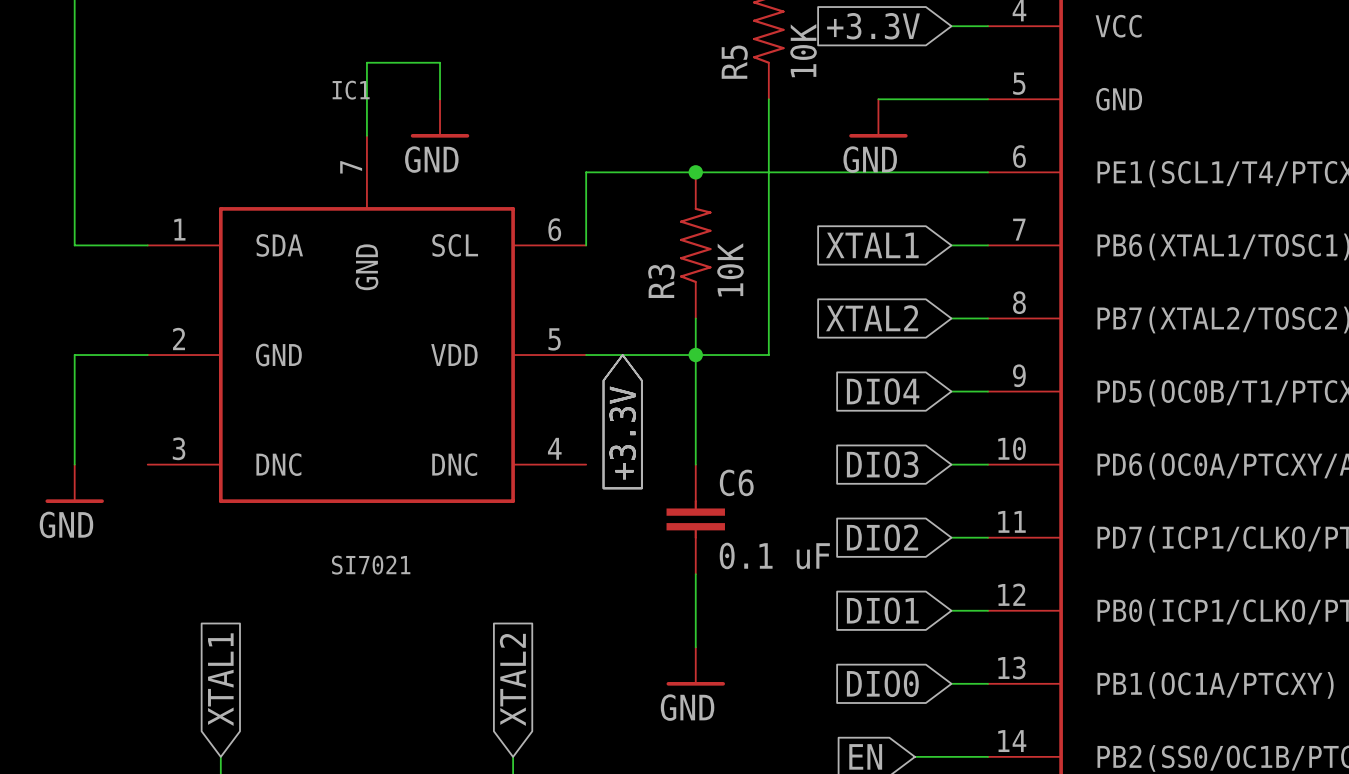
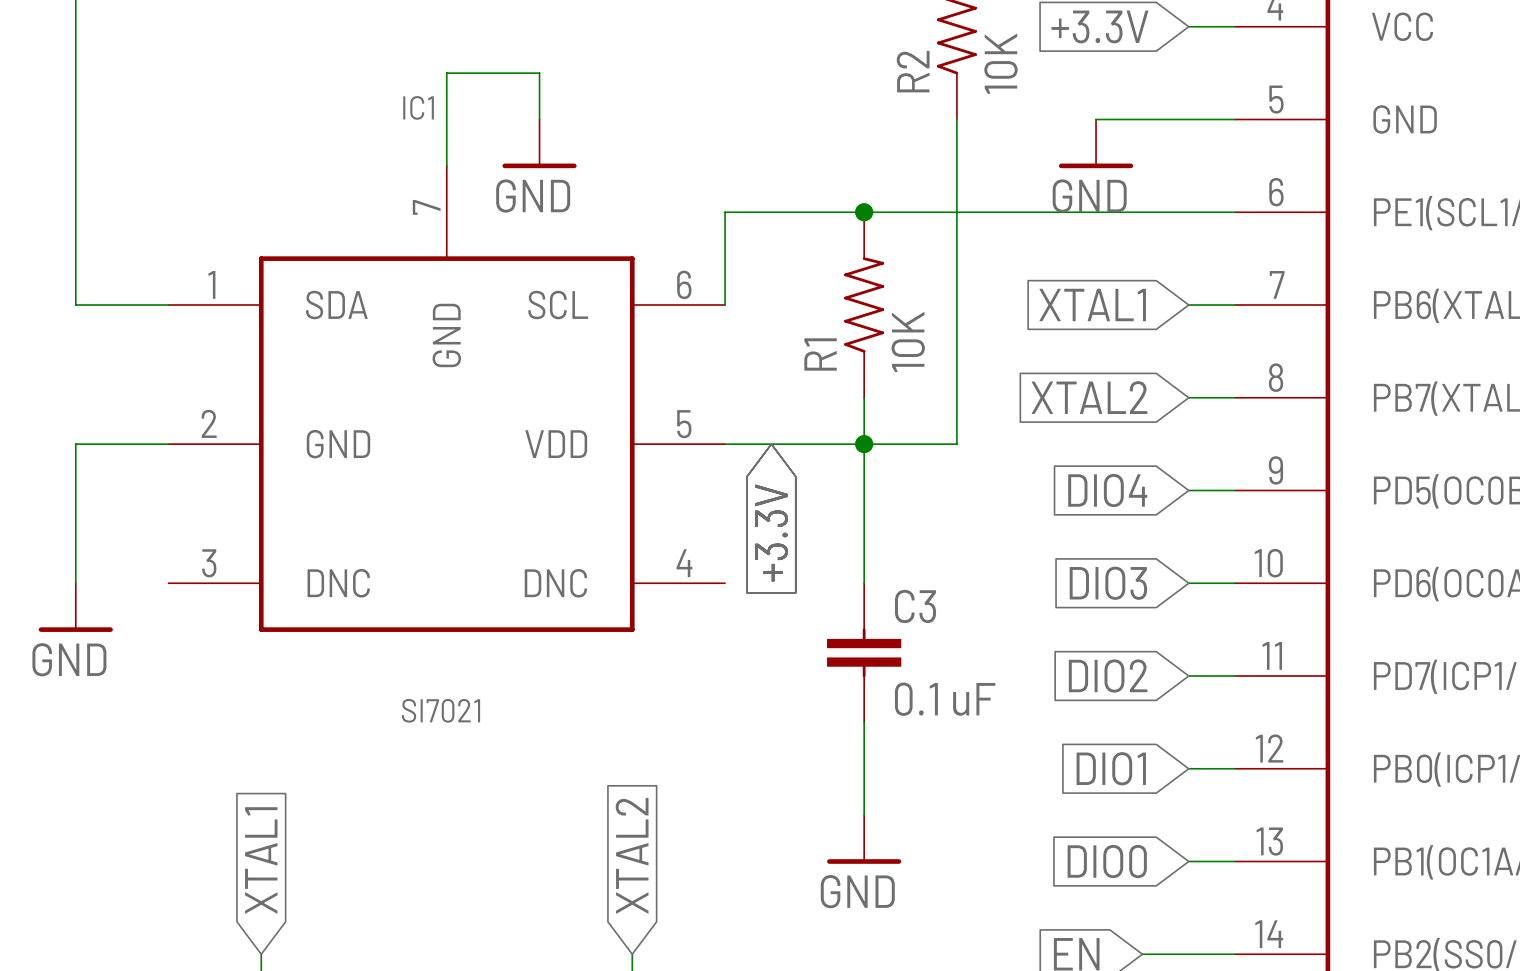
R5 name: R5 (734, 62) -> R2 (913, 71)
R3 name: R3 (661, 281) -> R1 (820, 354)
C6 name: C6 (736, 482) -> C3 (915, 606)

